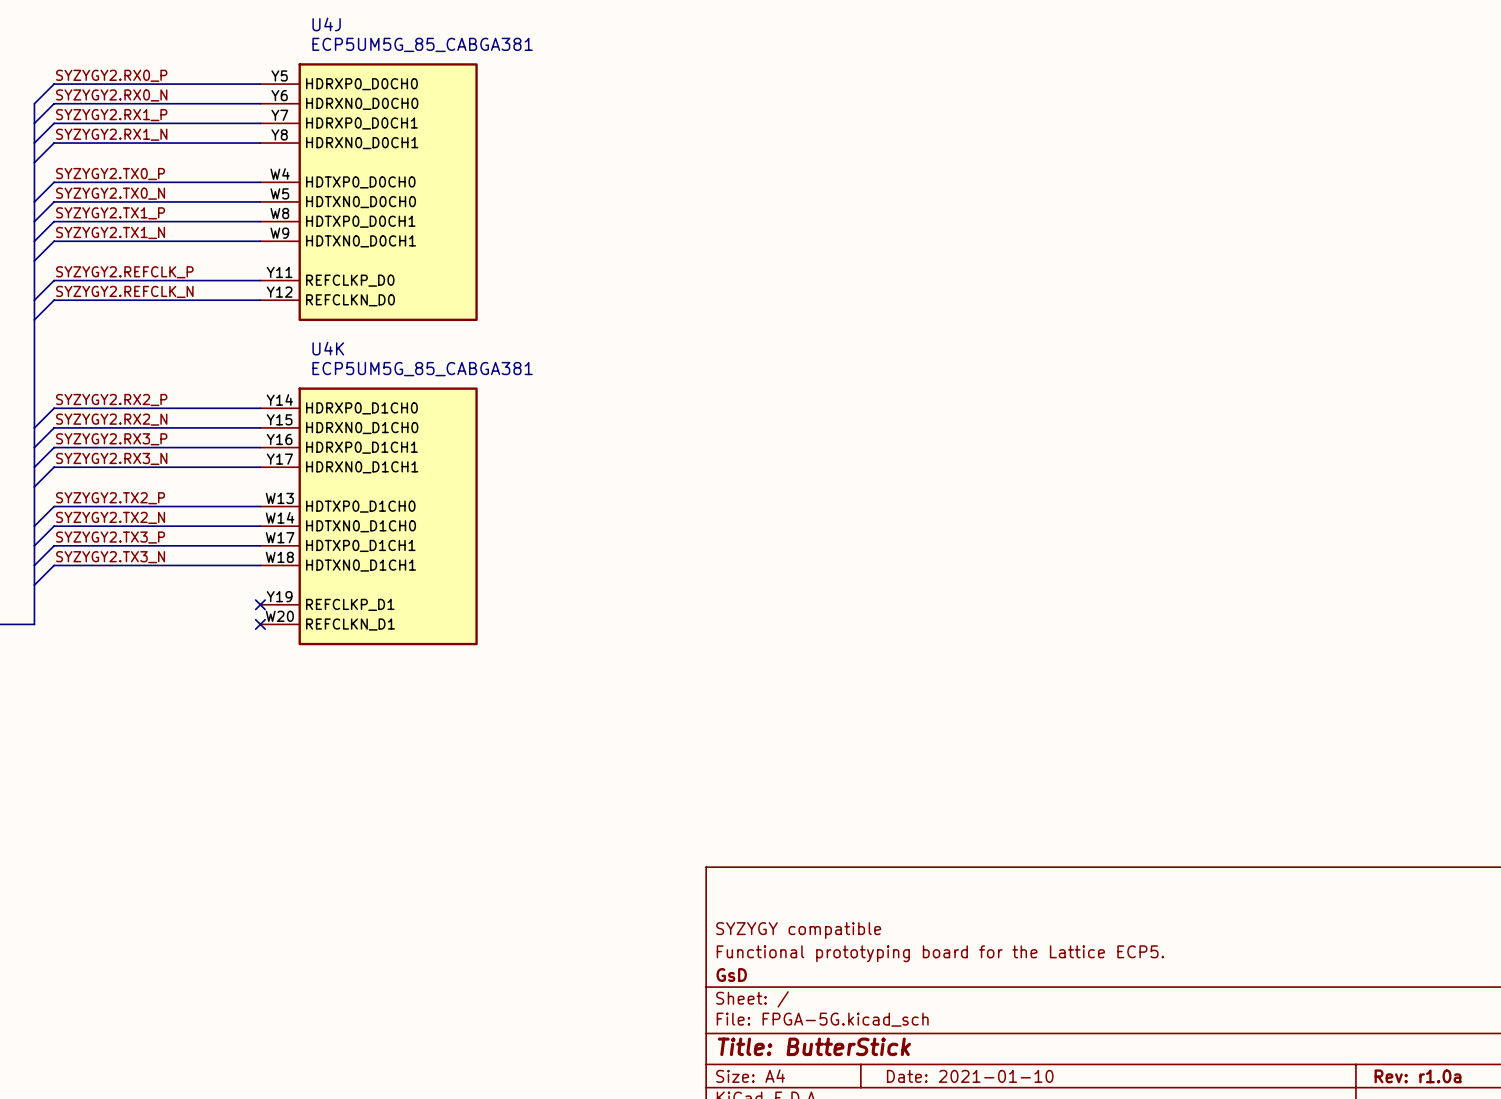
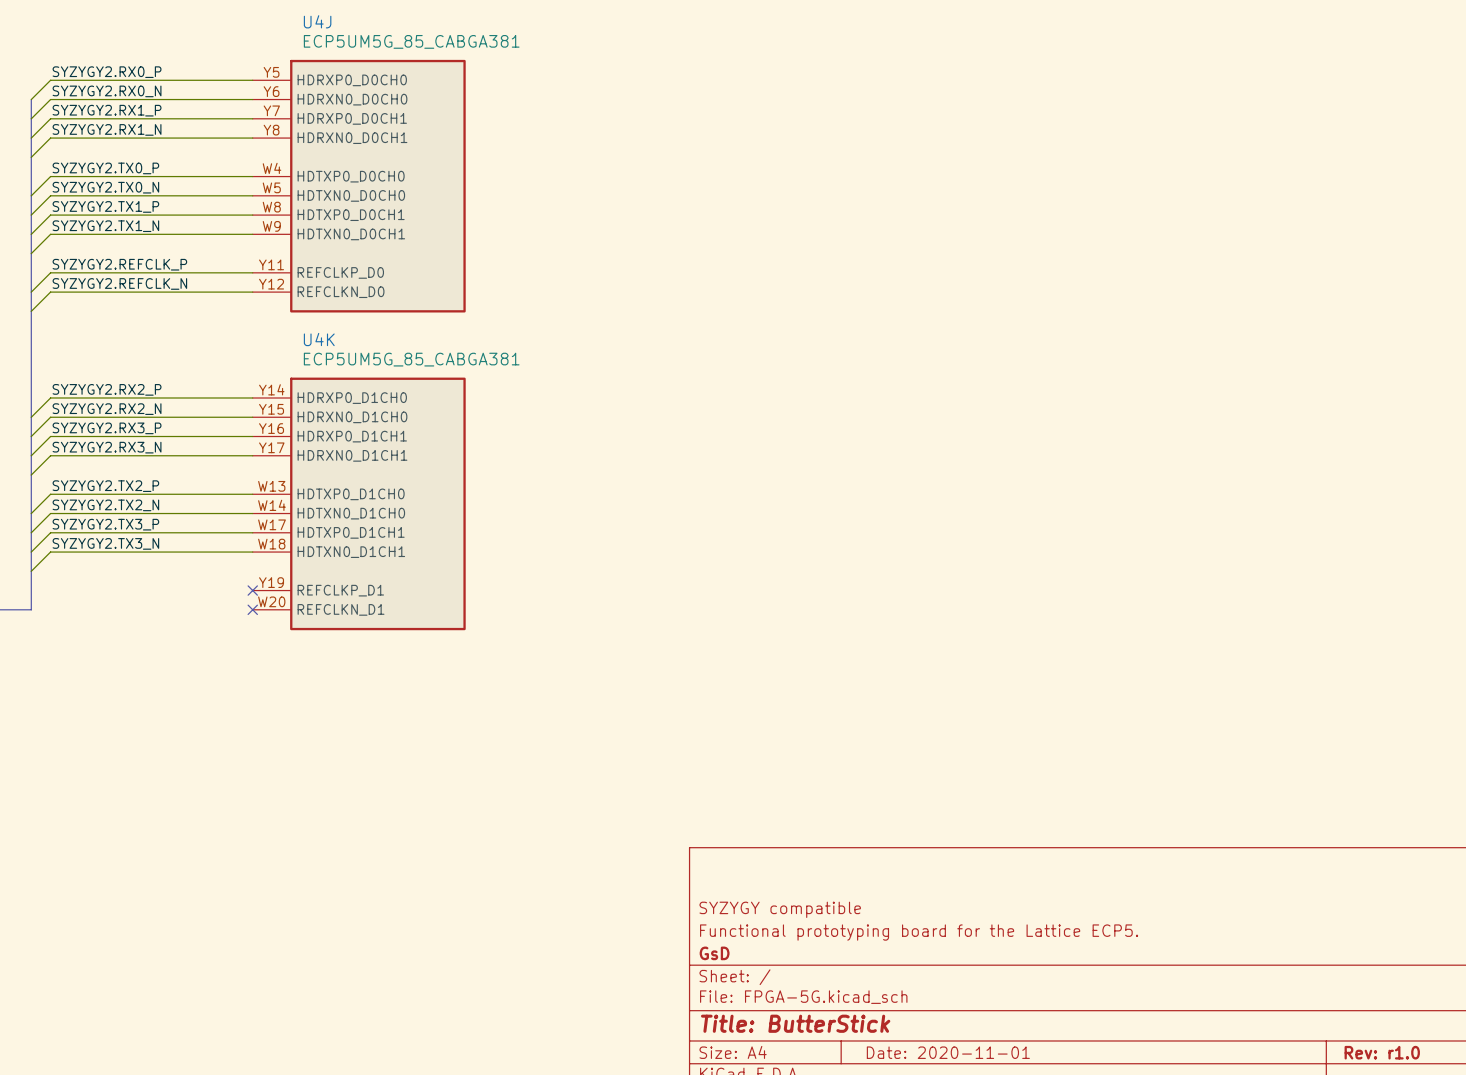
title block: Date: 2021-01-10 (970, 1076) -> Date: 2020-11-01 (948, 1052)
title block: Rev: r1.0a (1417, 1076) -> Rev: r1.0 (1382, 1052)

